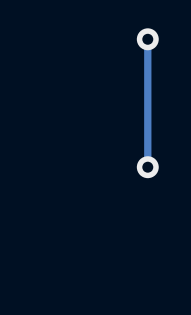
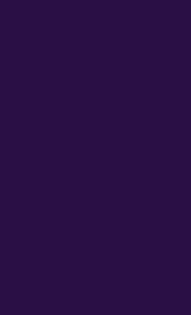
track: (147, 39) (147, 167) -> none
via: (147, 39) -> none
via: (147, 167) -> none

